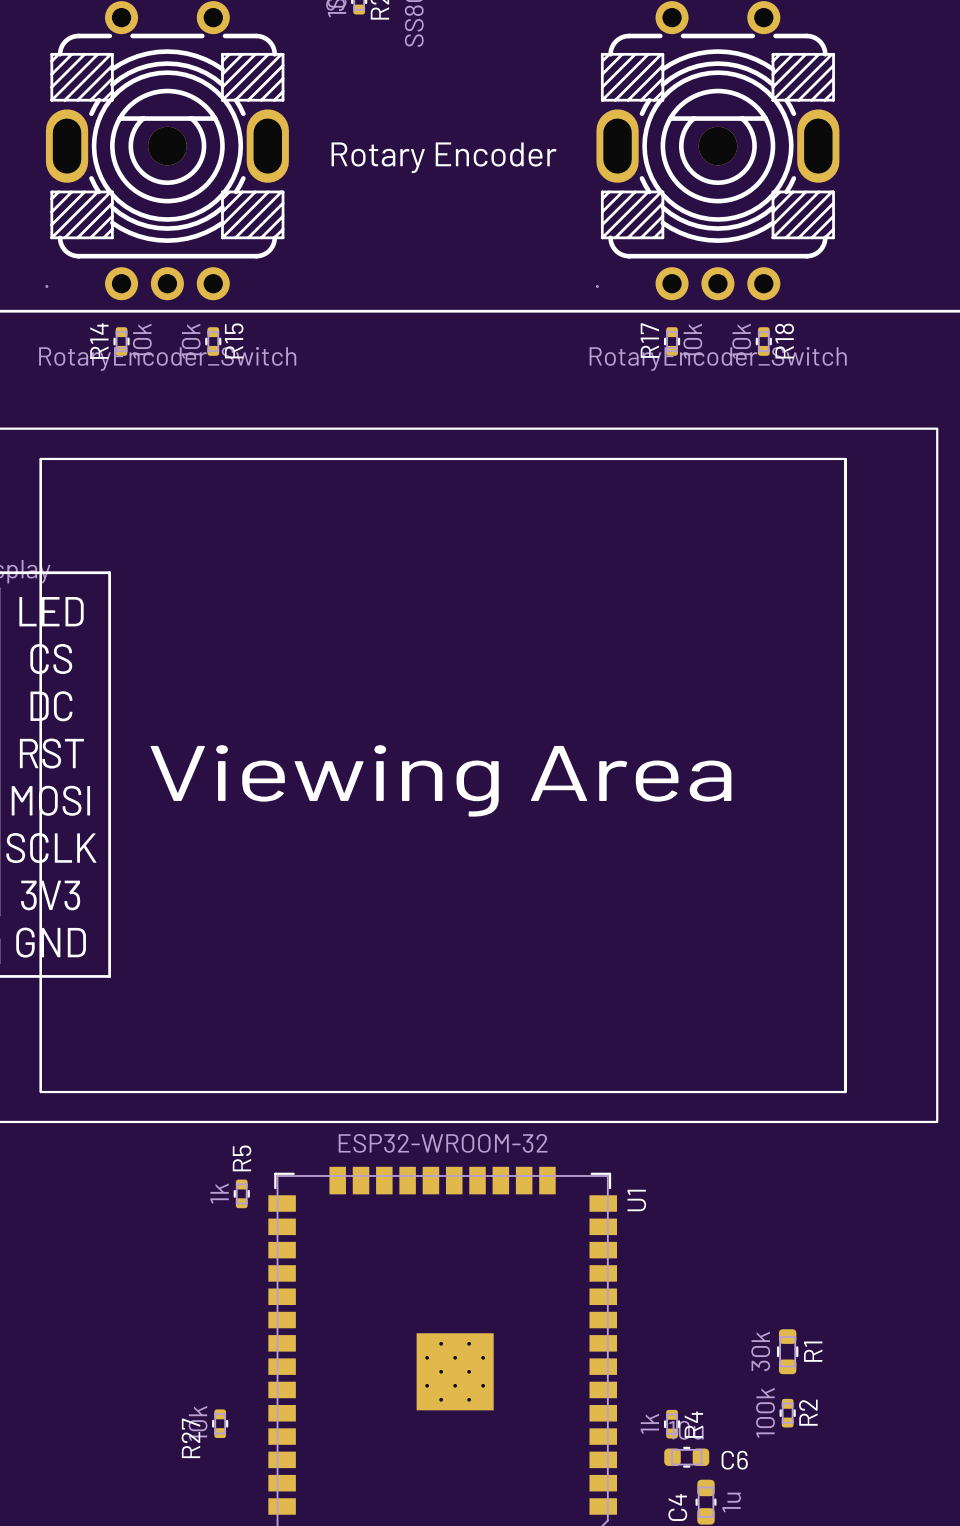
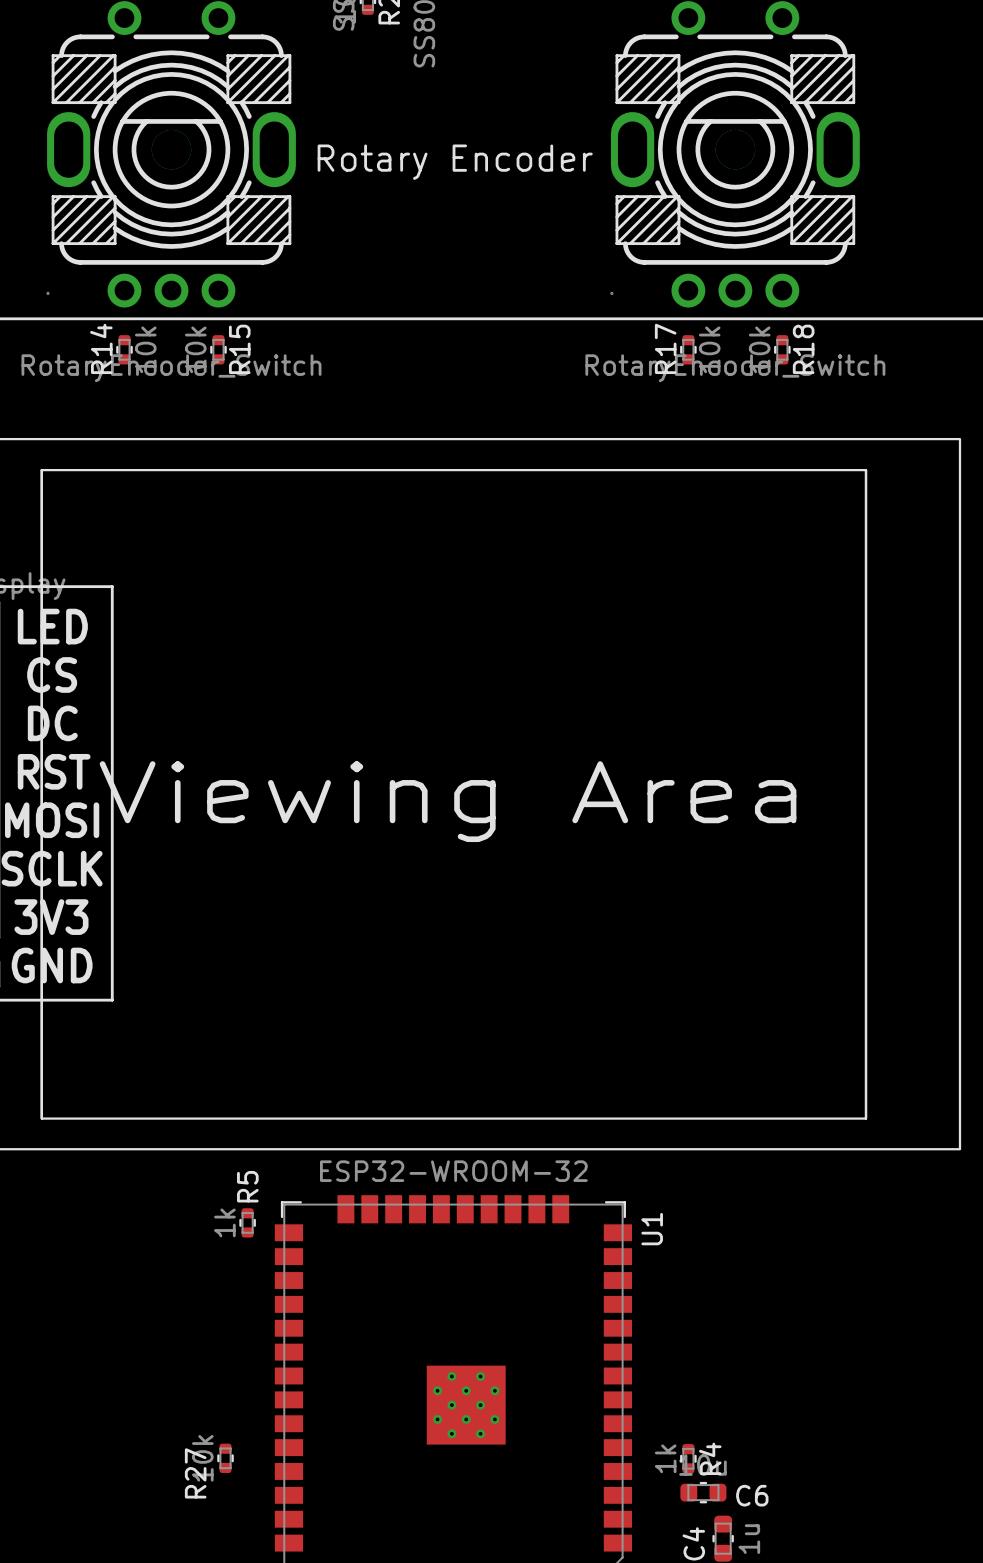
R1: 30k (787, 1351) -> none
R2: 100k (787, 1413) -> none

